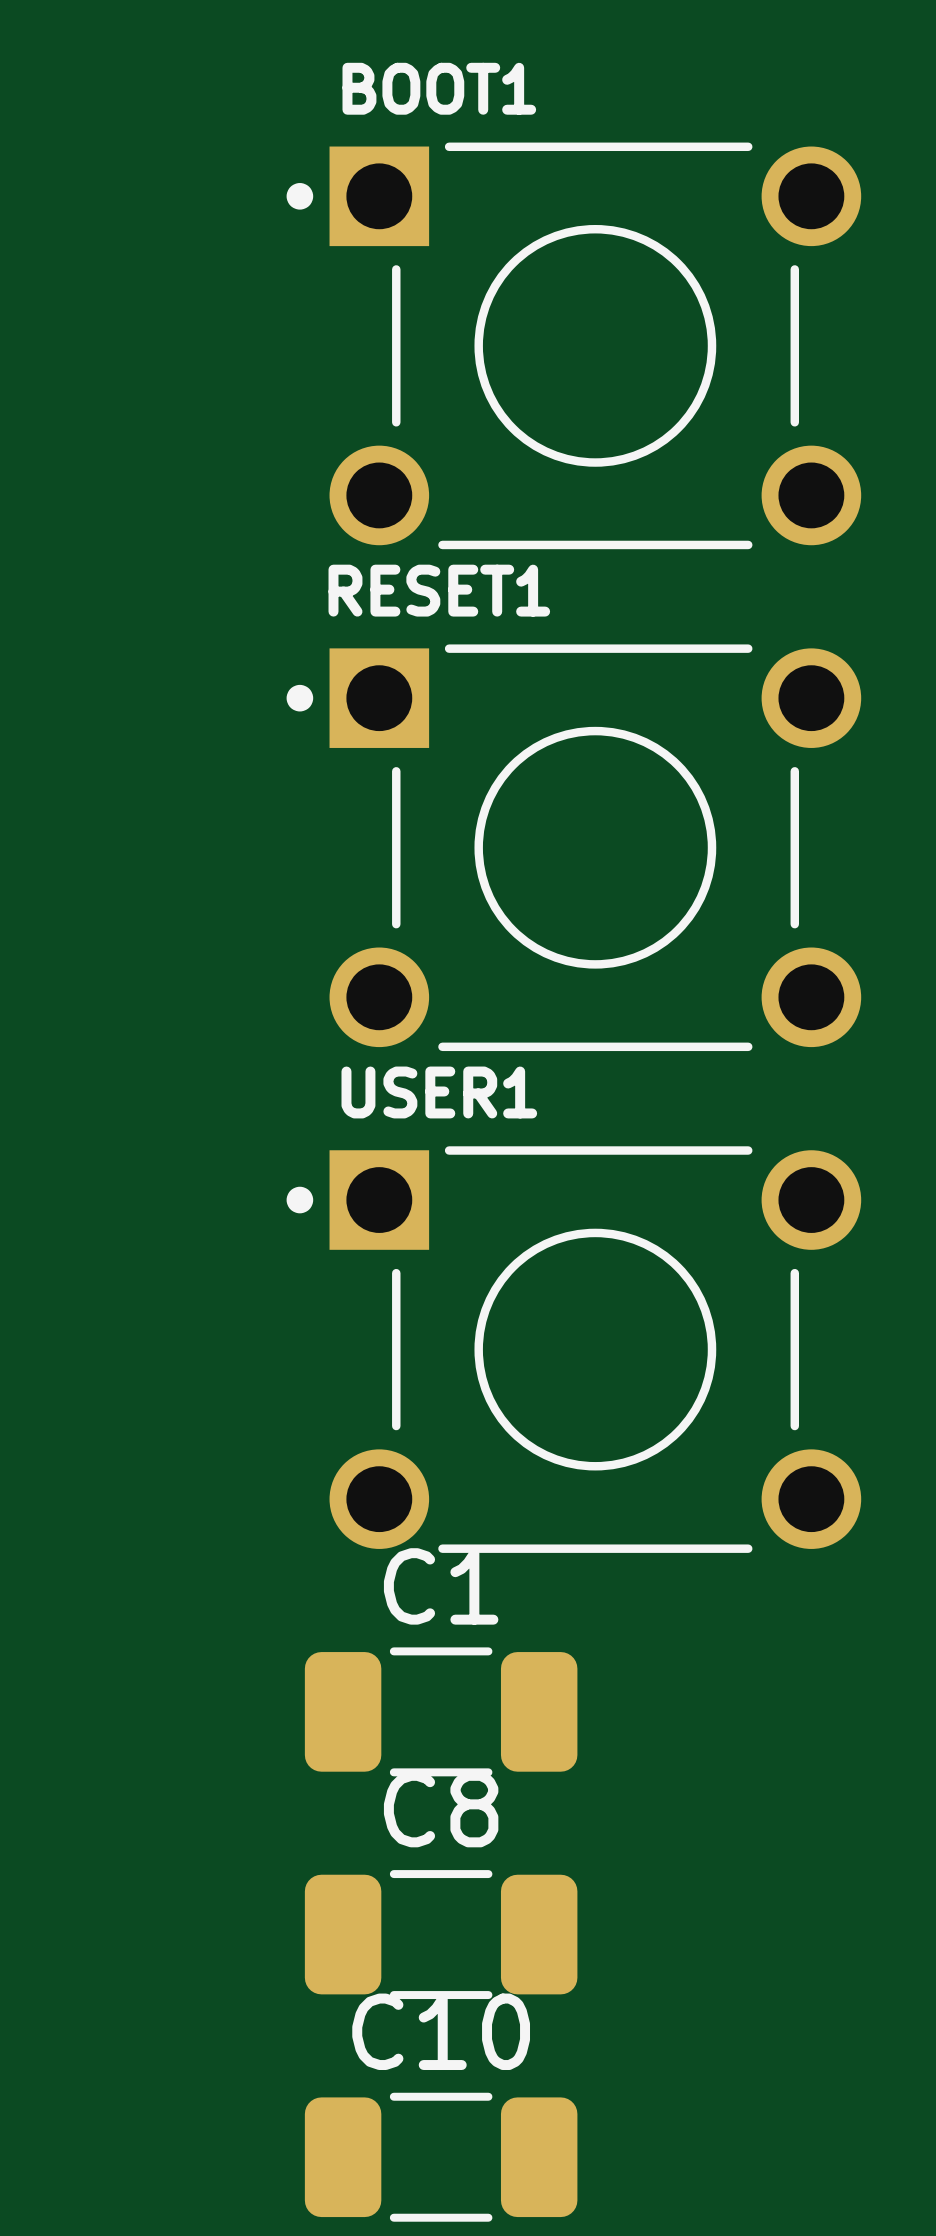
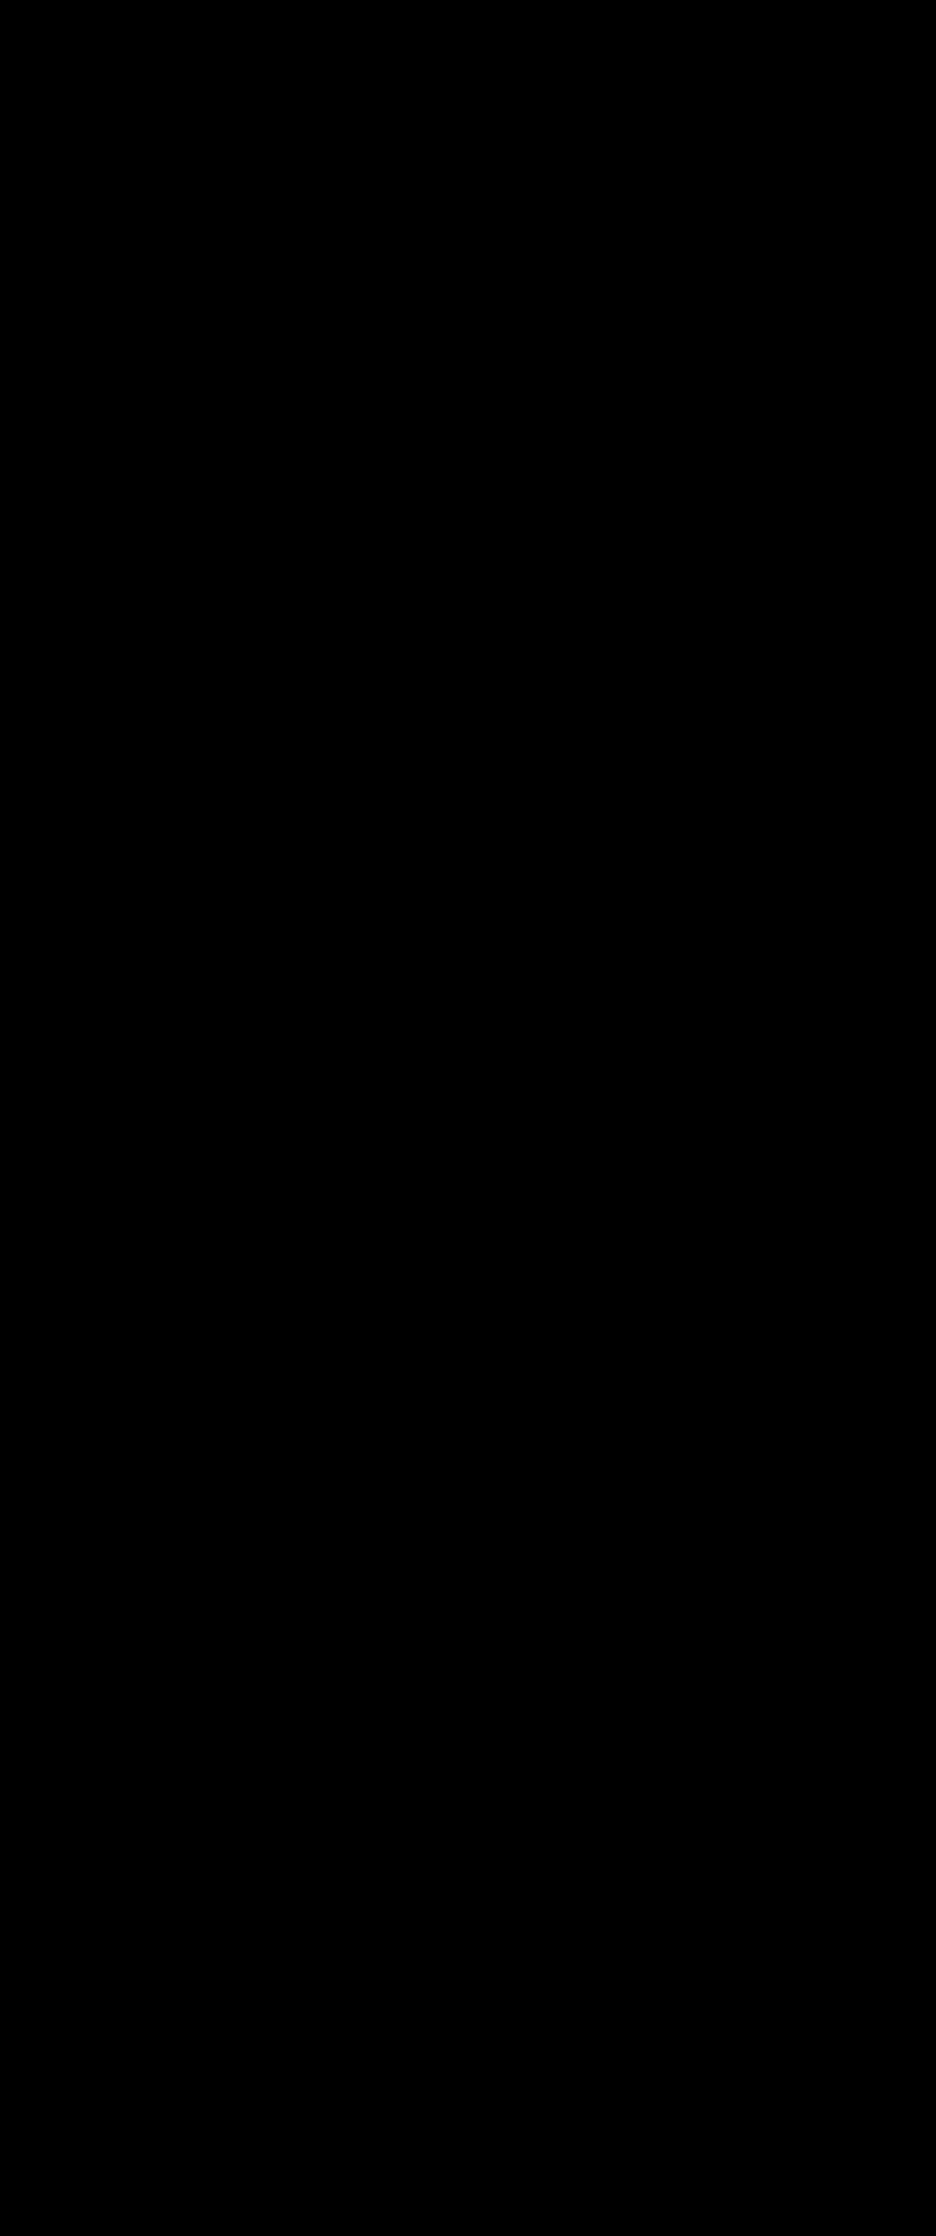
BOOT1: (573, 345) -> none
RESET1: (573, 847) -> none
USER1: (573, 1349) -> none
C1: (441, 1711) -> none
C8: (441, 1934) -> none
C10: (441, 2157) -> none

